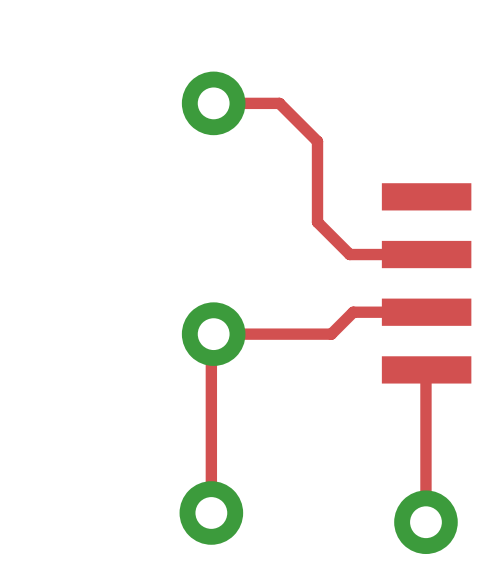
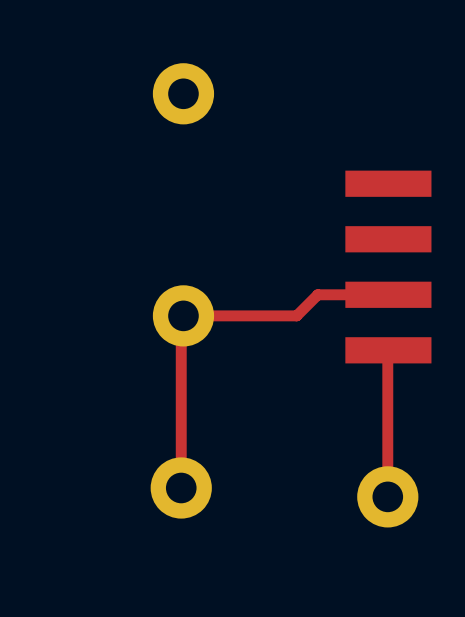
top track: (213, 103) (279, 103) (317, 141) (317, 222) (349, 254) (426, 254) -> none

